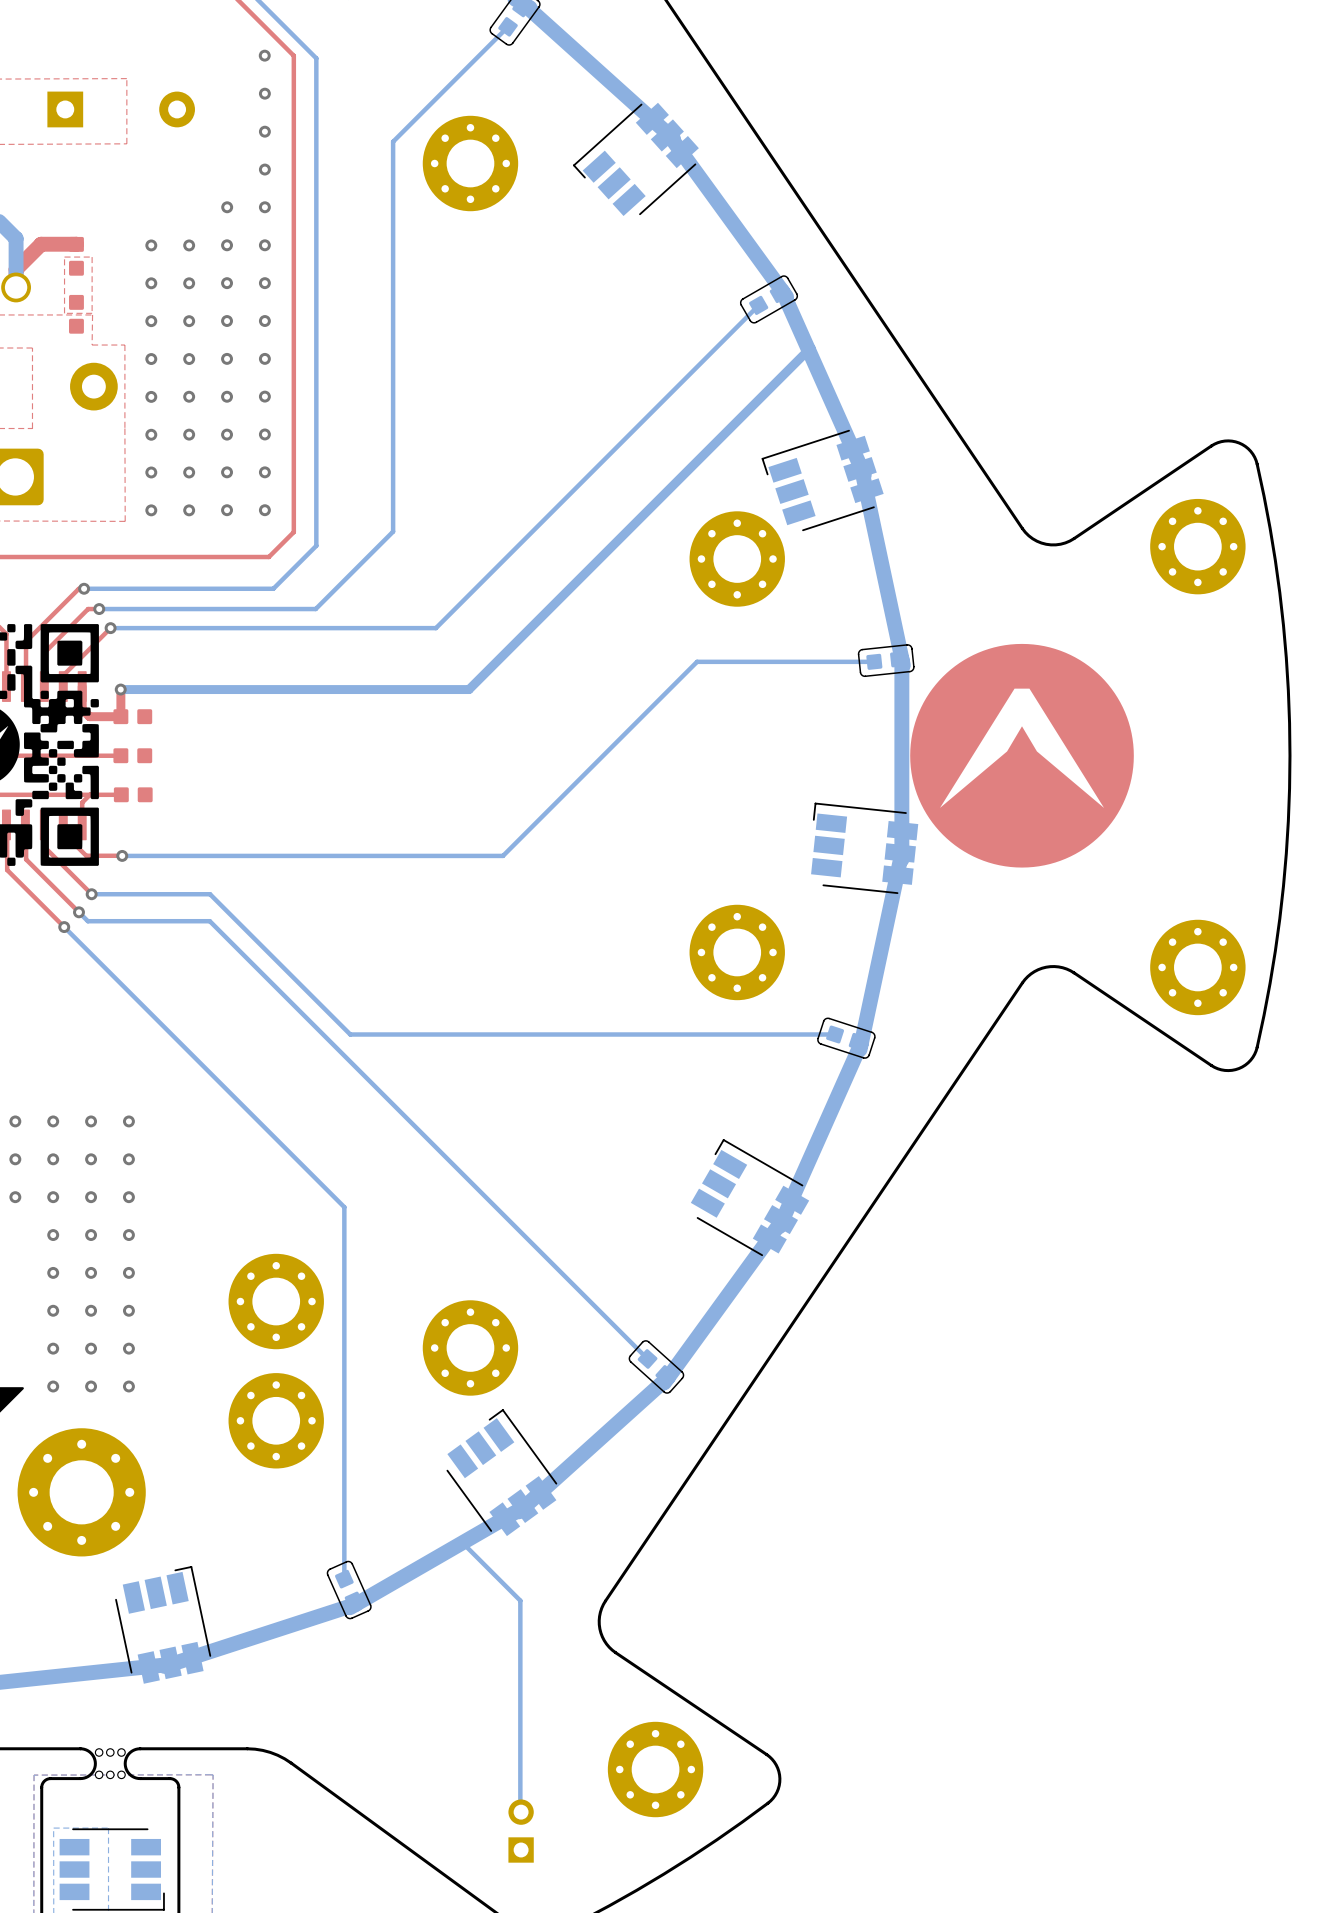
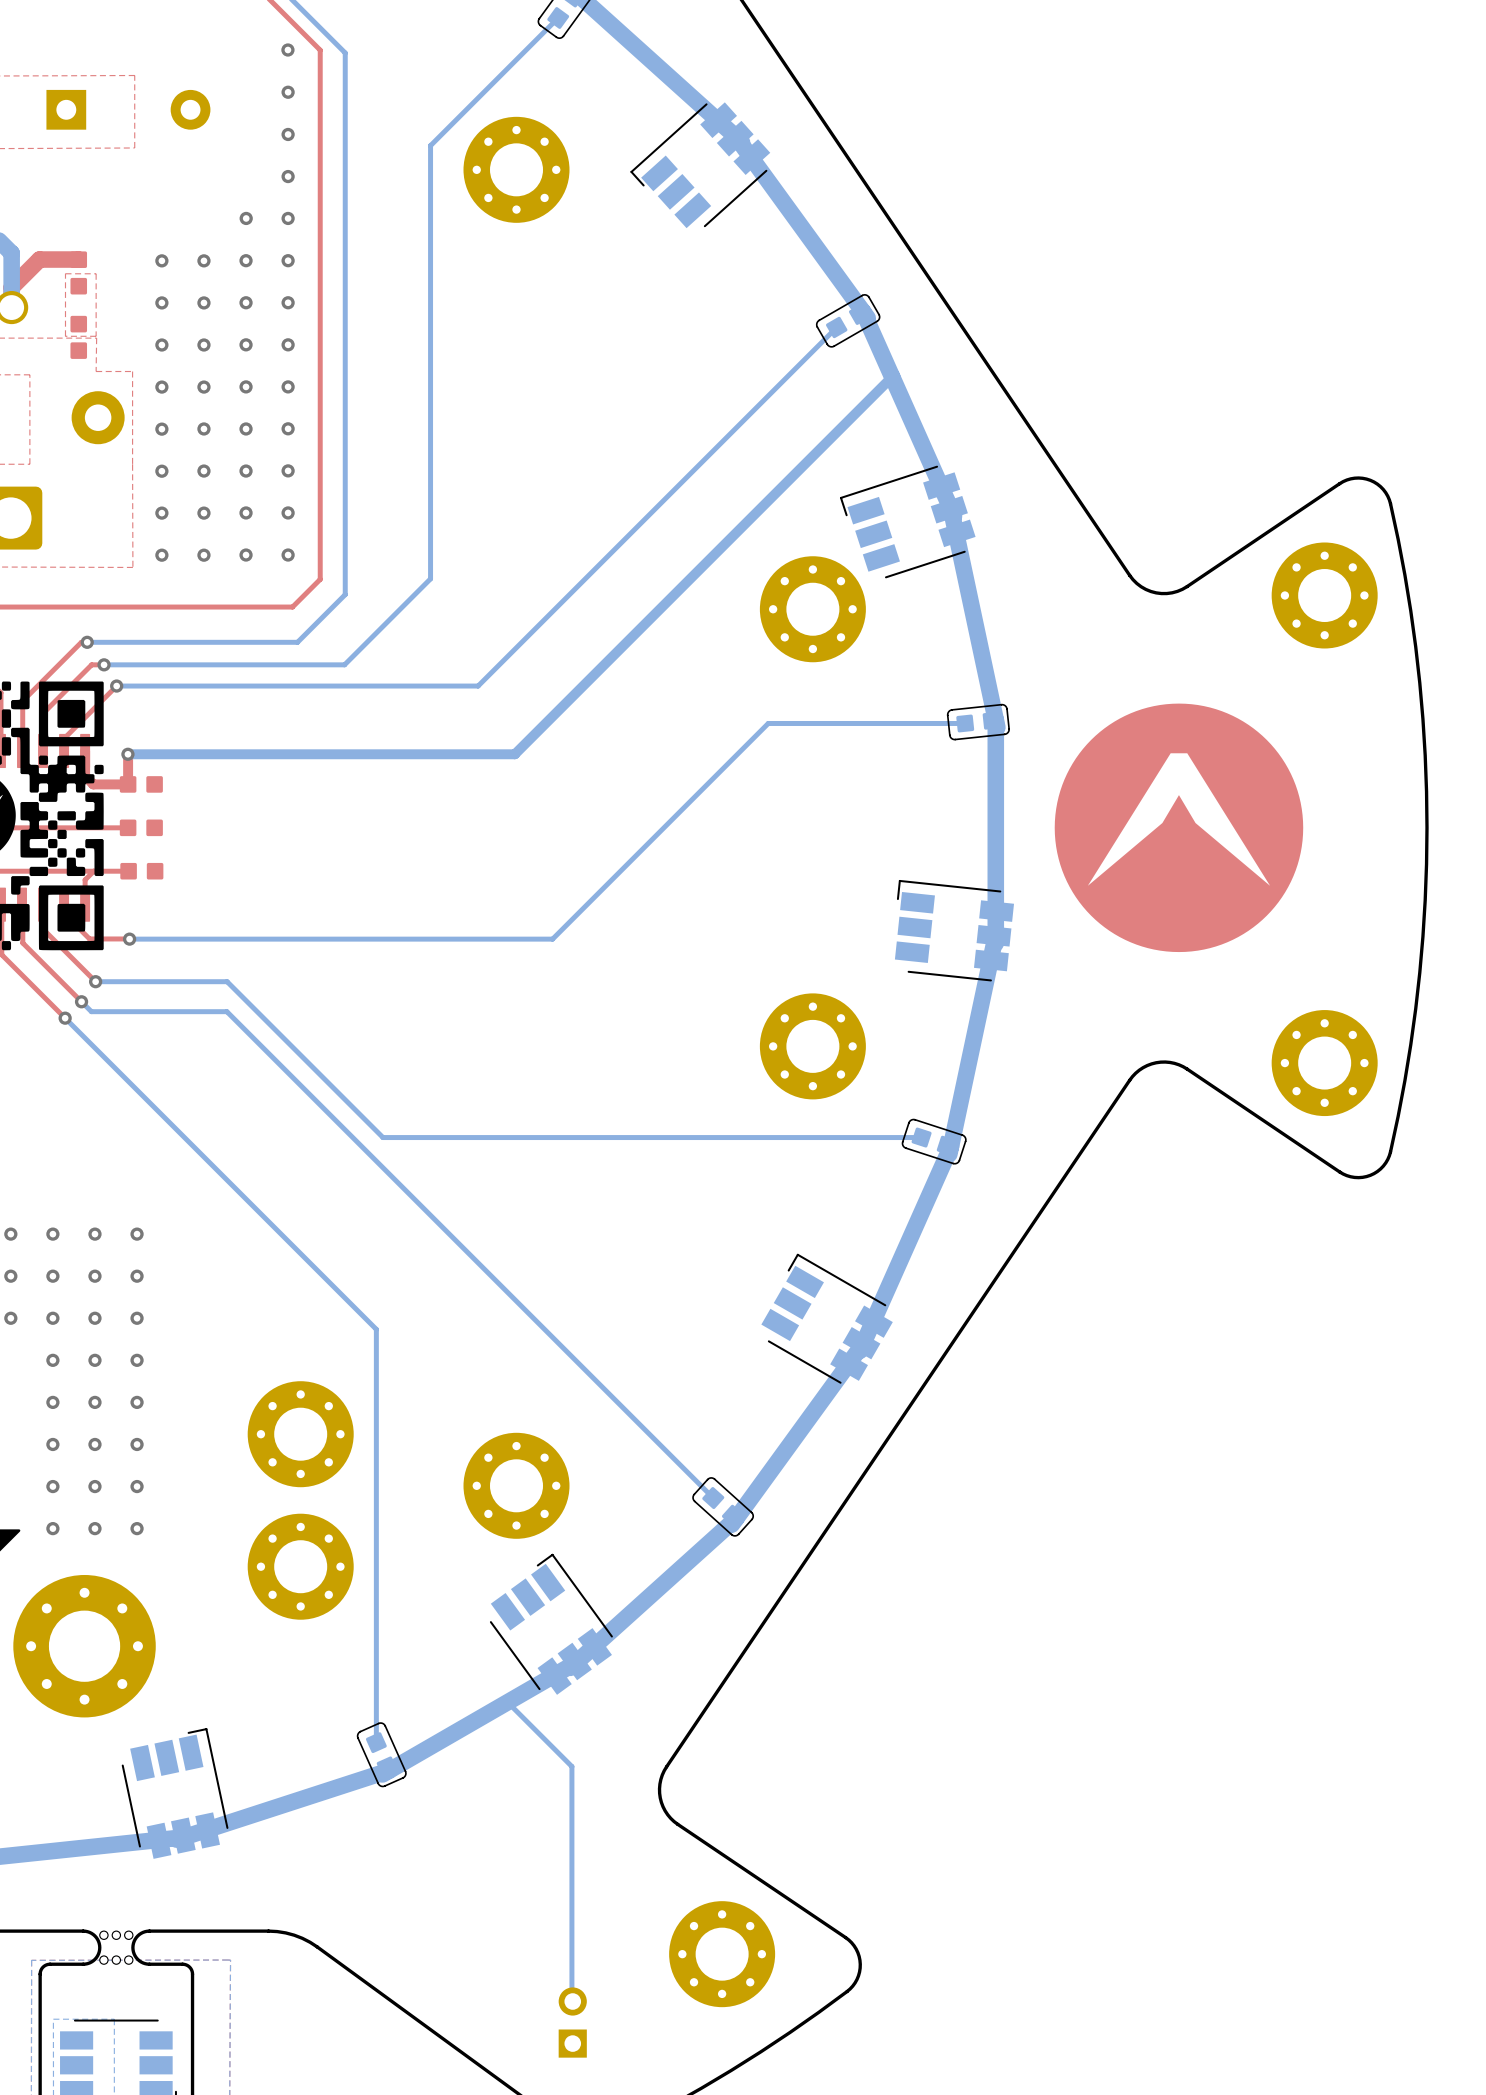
part position: (1022, 755) -> (1178, 827)

